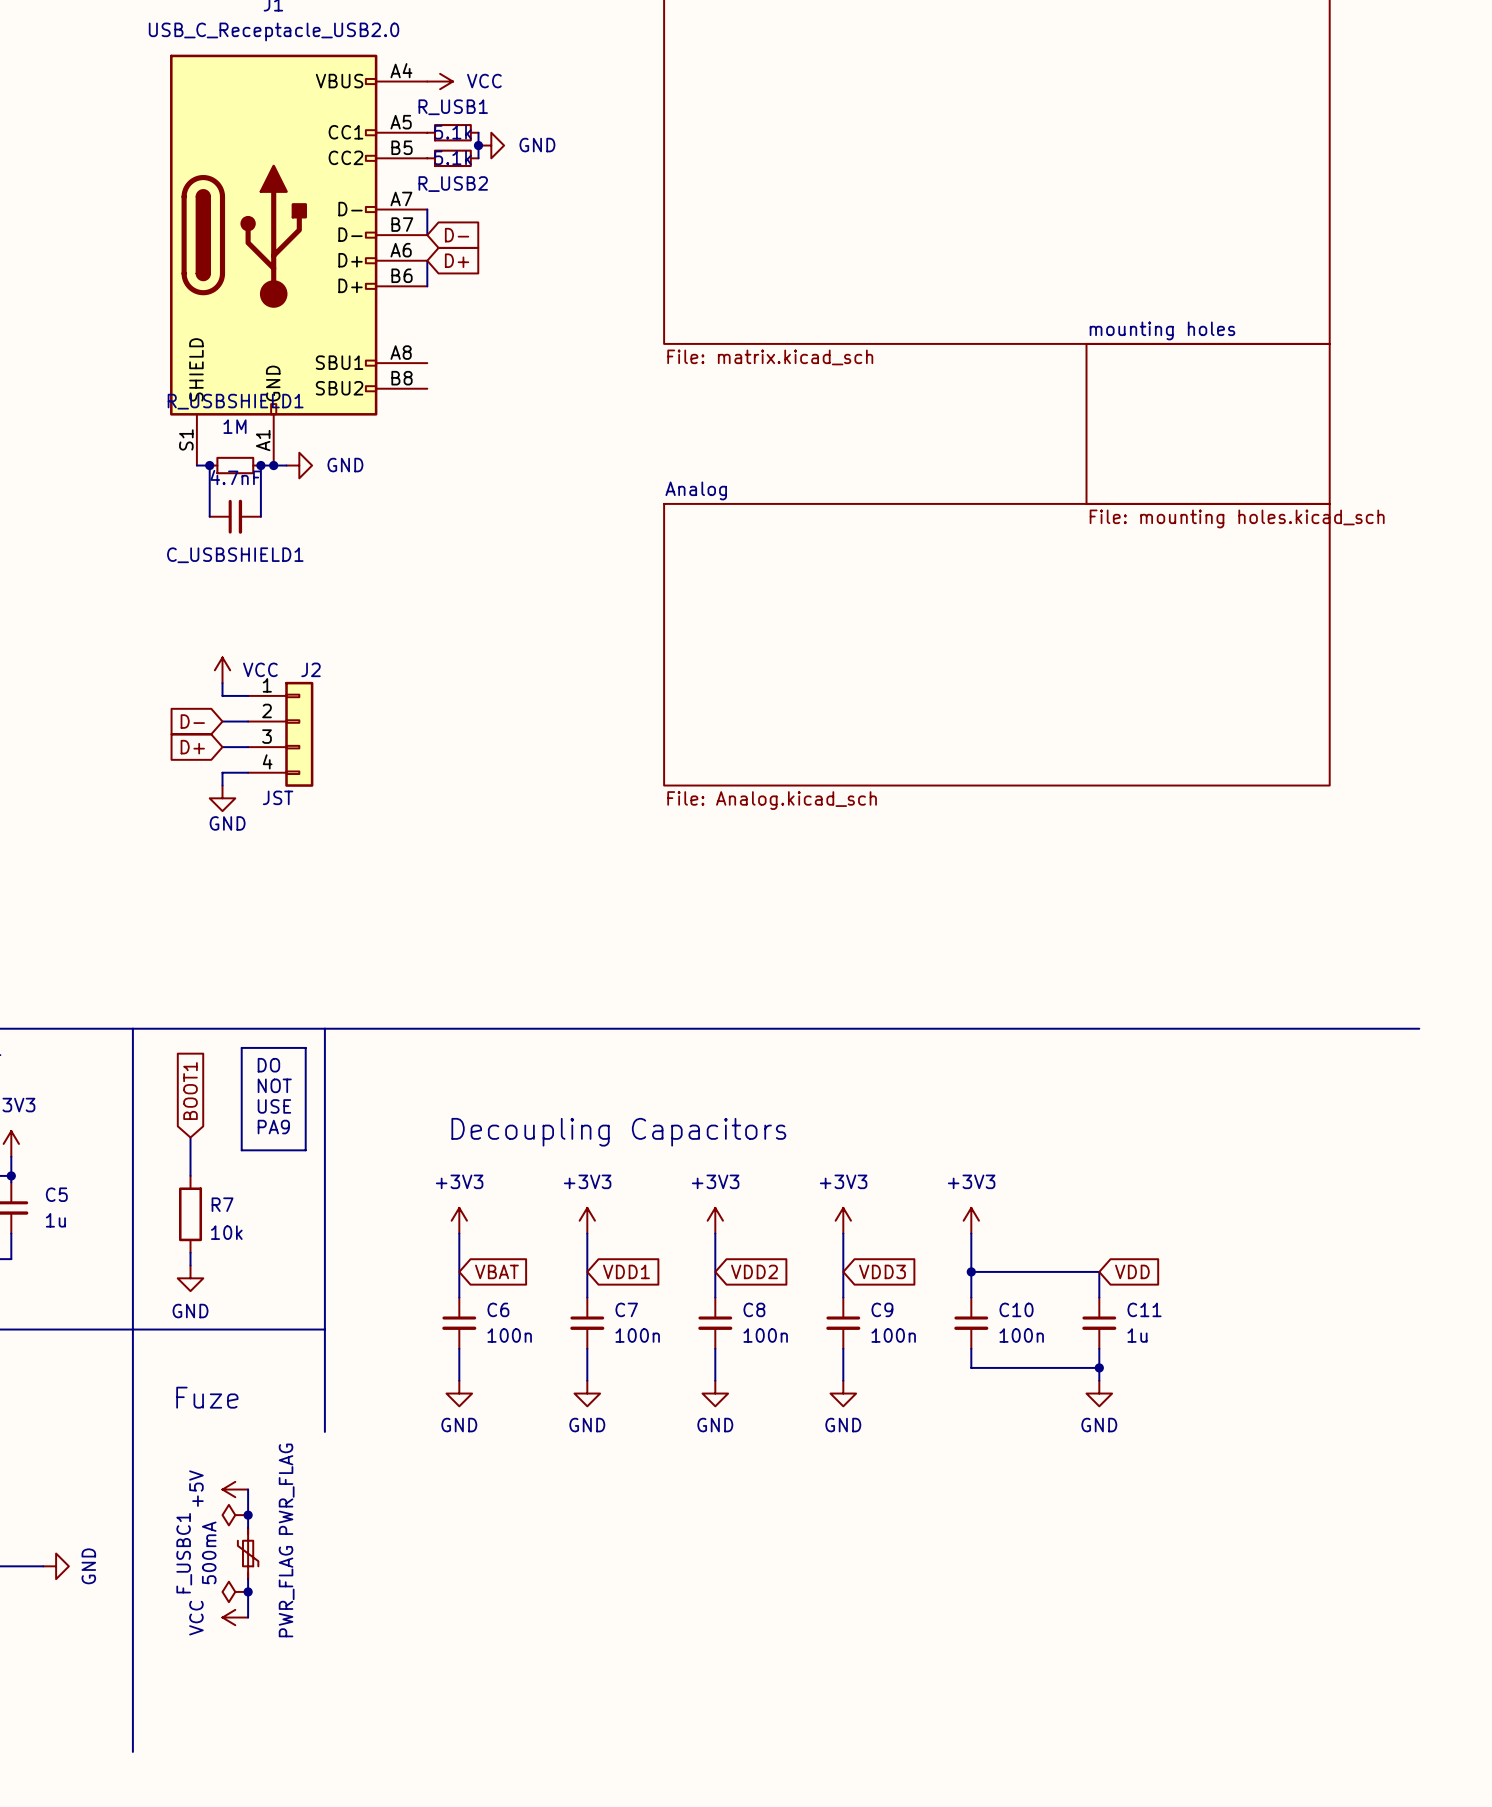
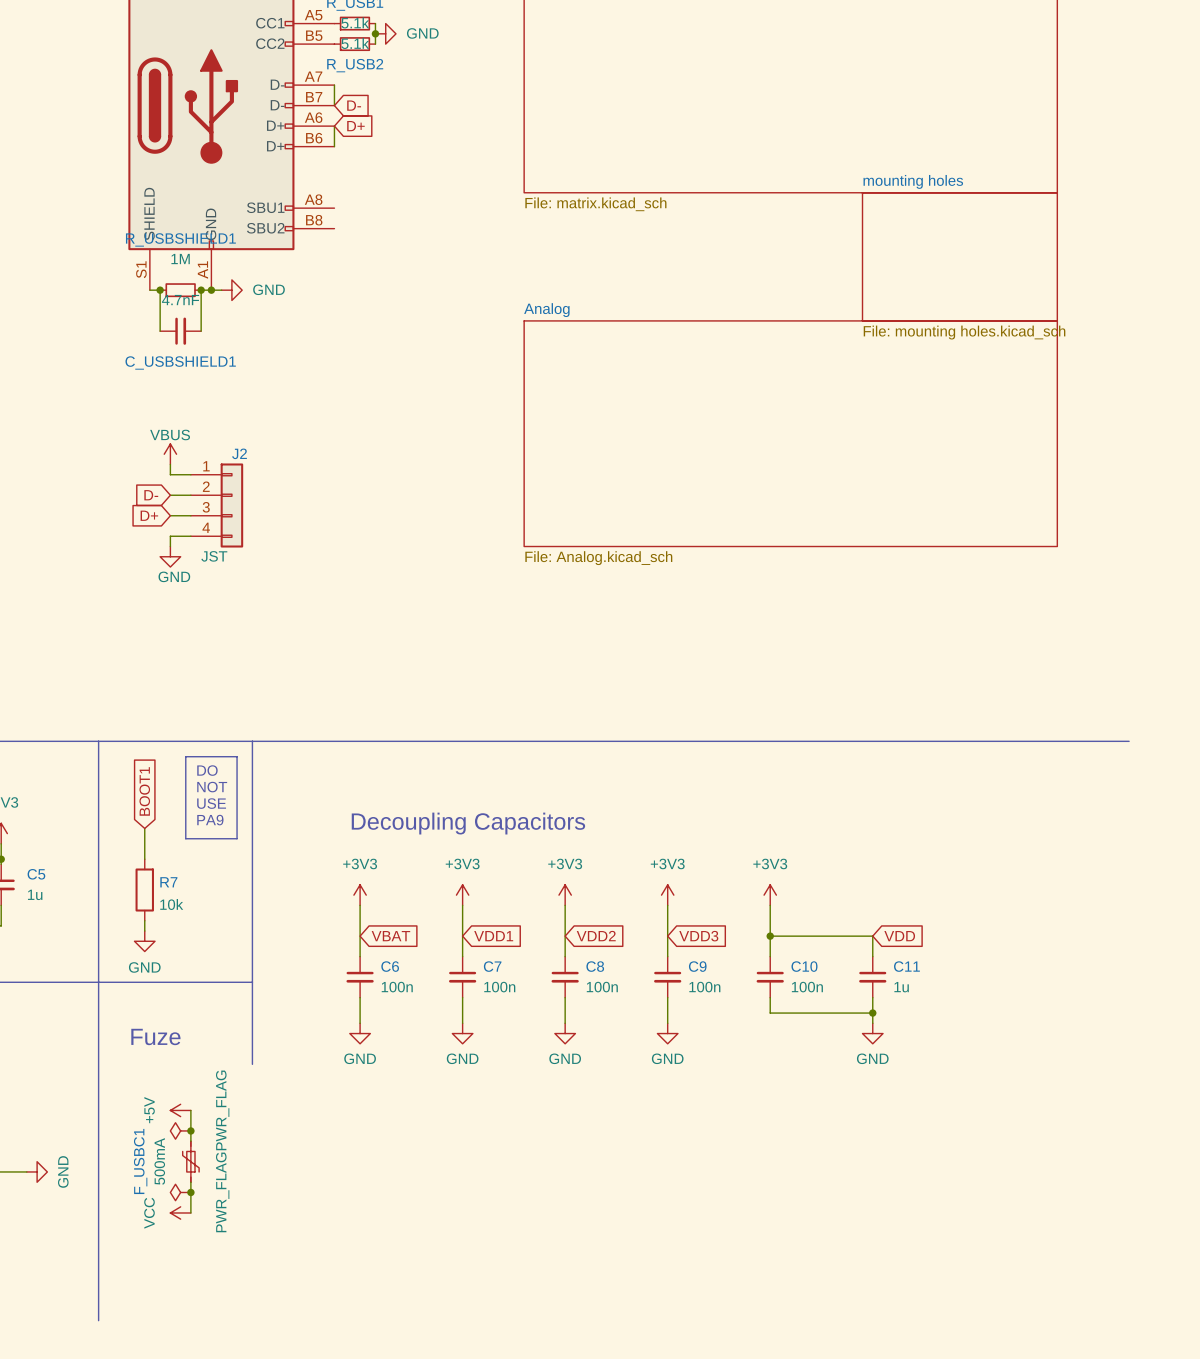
power symbol: VCC (222, 670) -> VBUS (170, 454)

